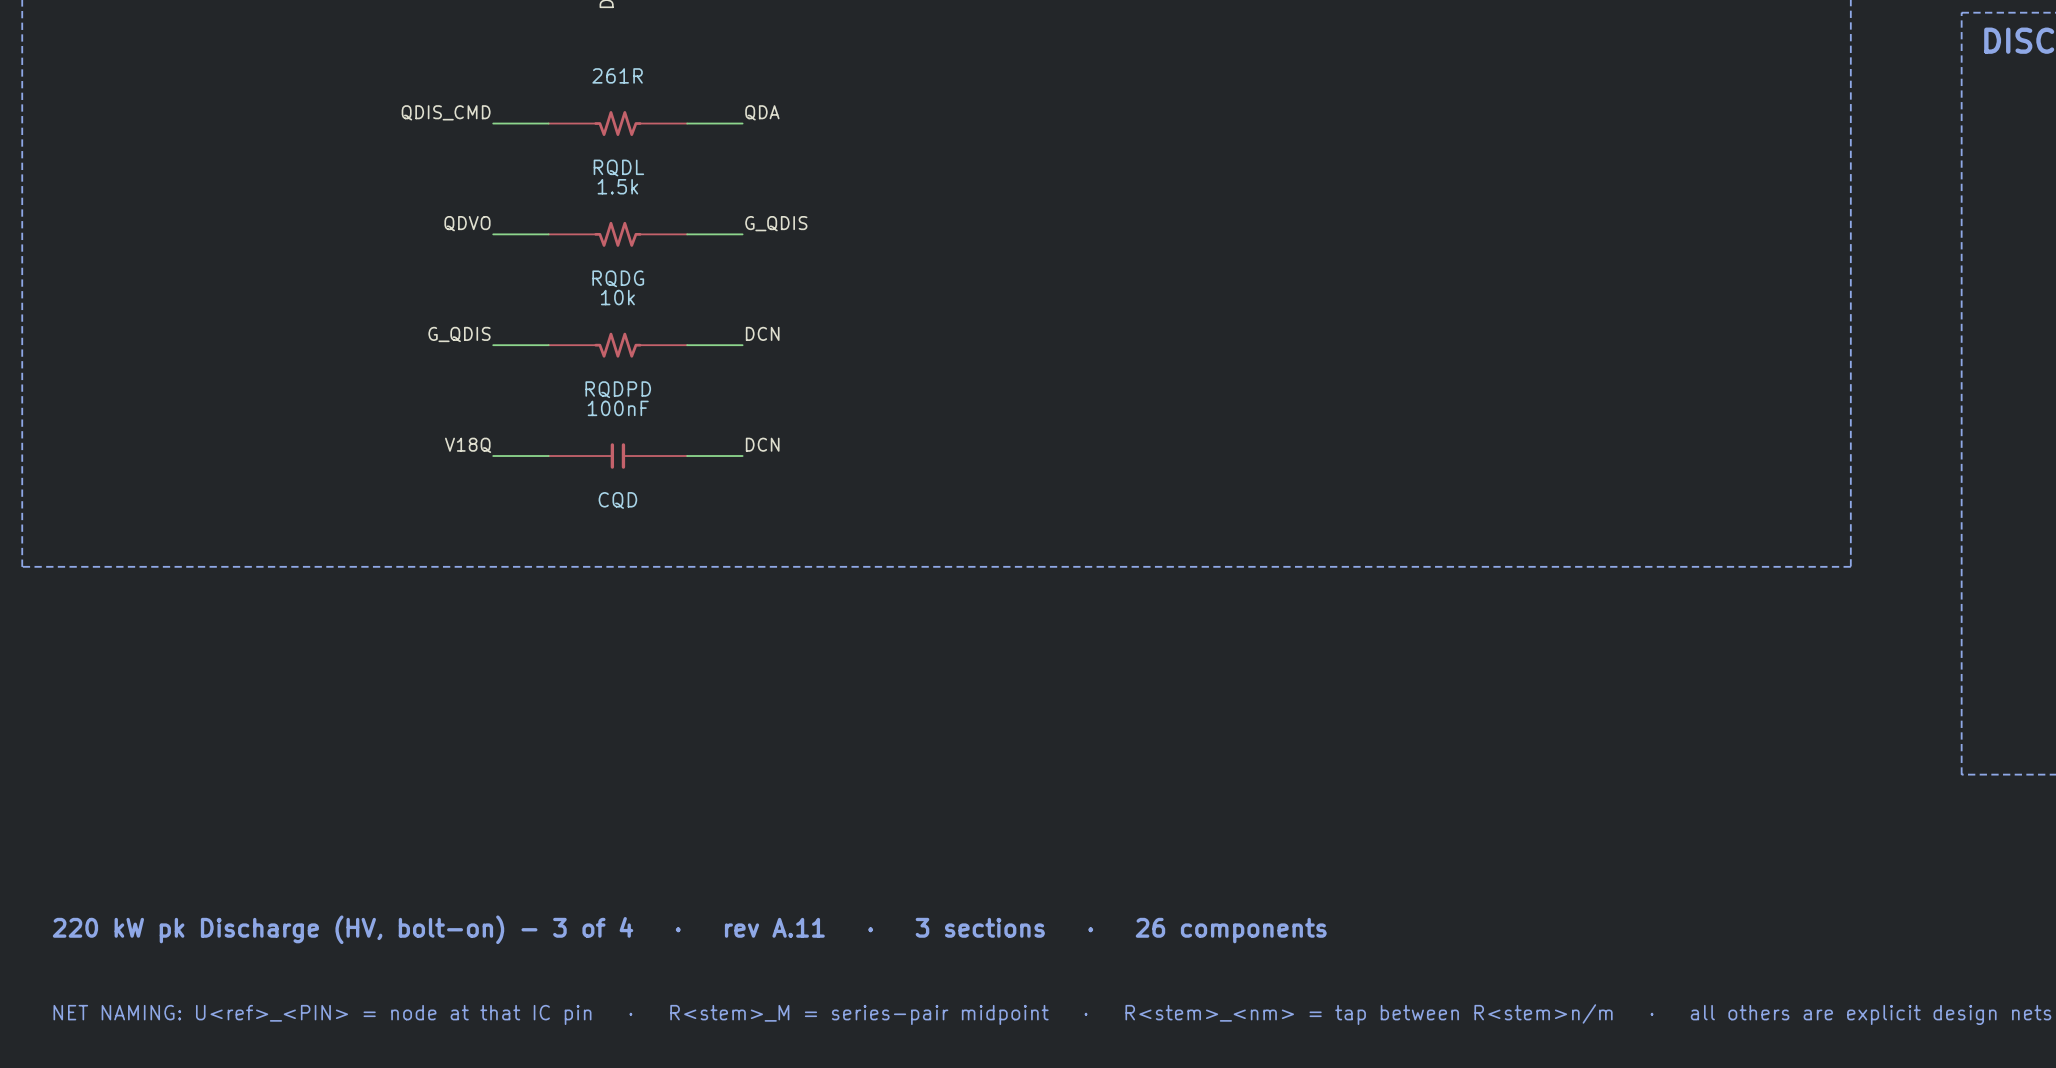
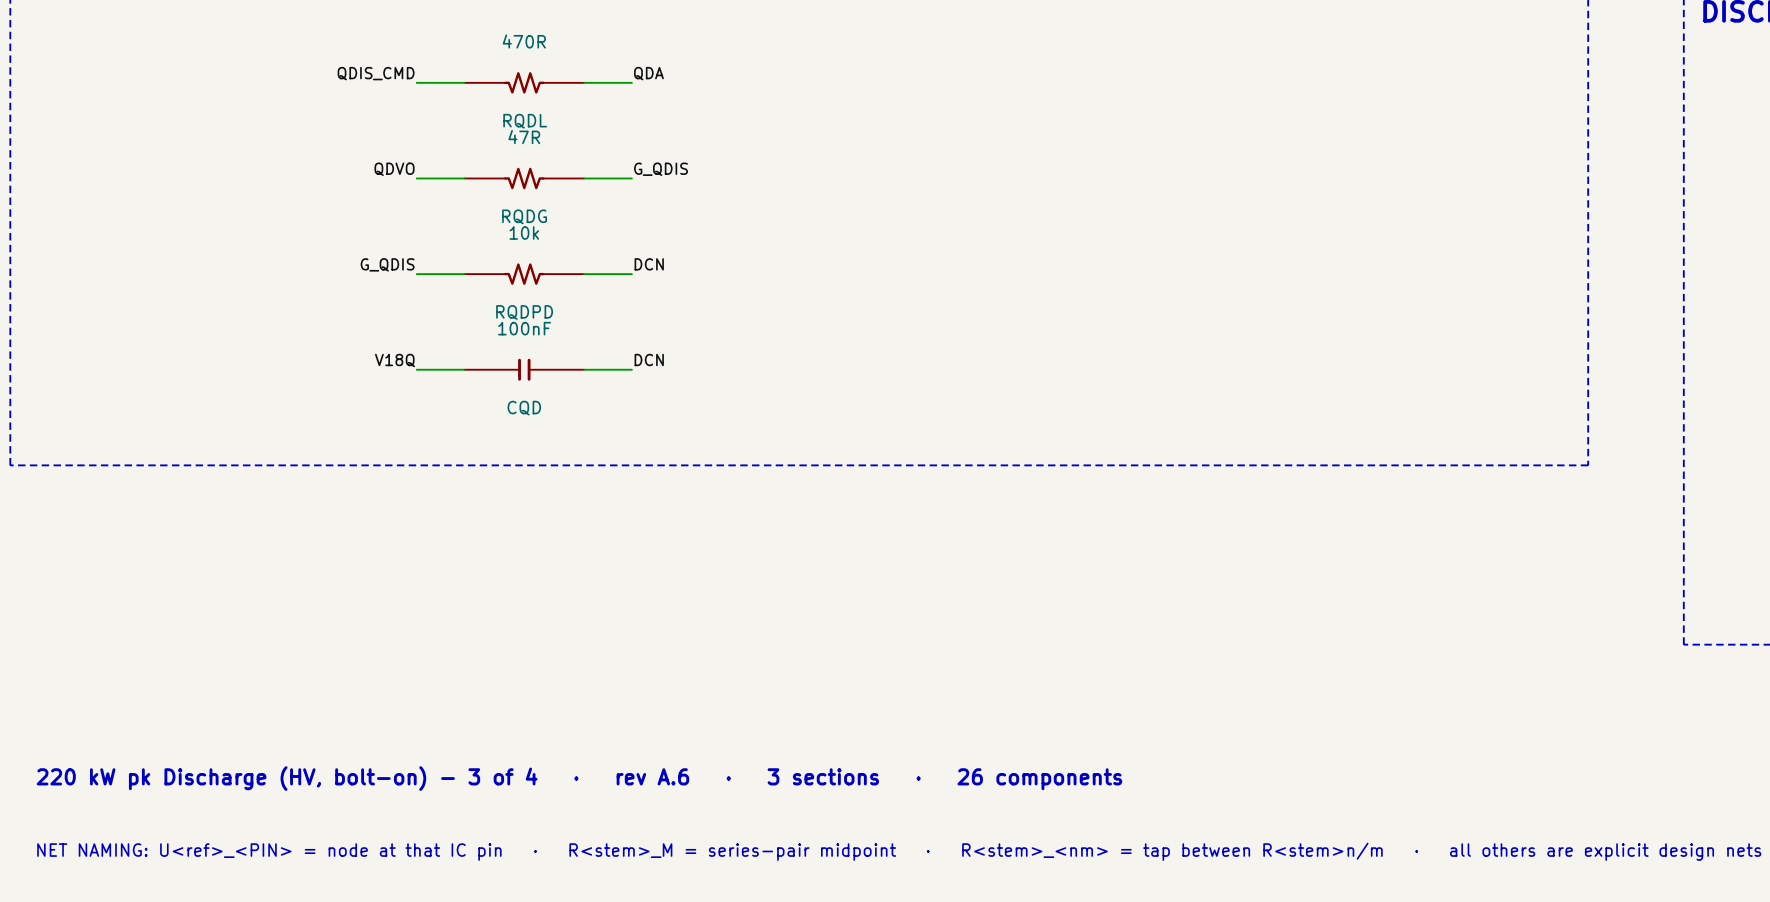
RQDL value: 261R (617, 75) -> 470R (524, 41)
RQDG value: 1.5k (617, 186) -> 47R (524, 137)
text: 220 kW pk Discharge (HV, bolt-on) - 3 of 4 · rev A.11 · 3 sections · 26 components (689, 929) -> 220 kW pk Discharge (HV, bolt-on) - 3 of 4 · rev A.6 · 3 sections · 26 components (579, 778)

